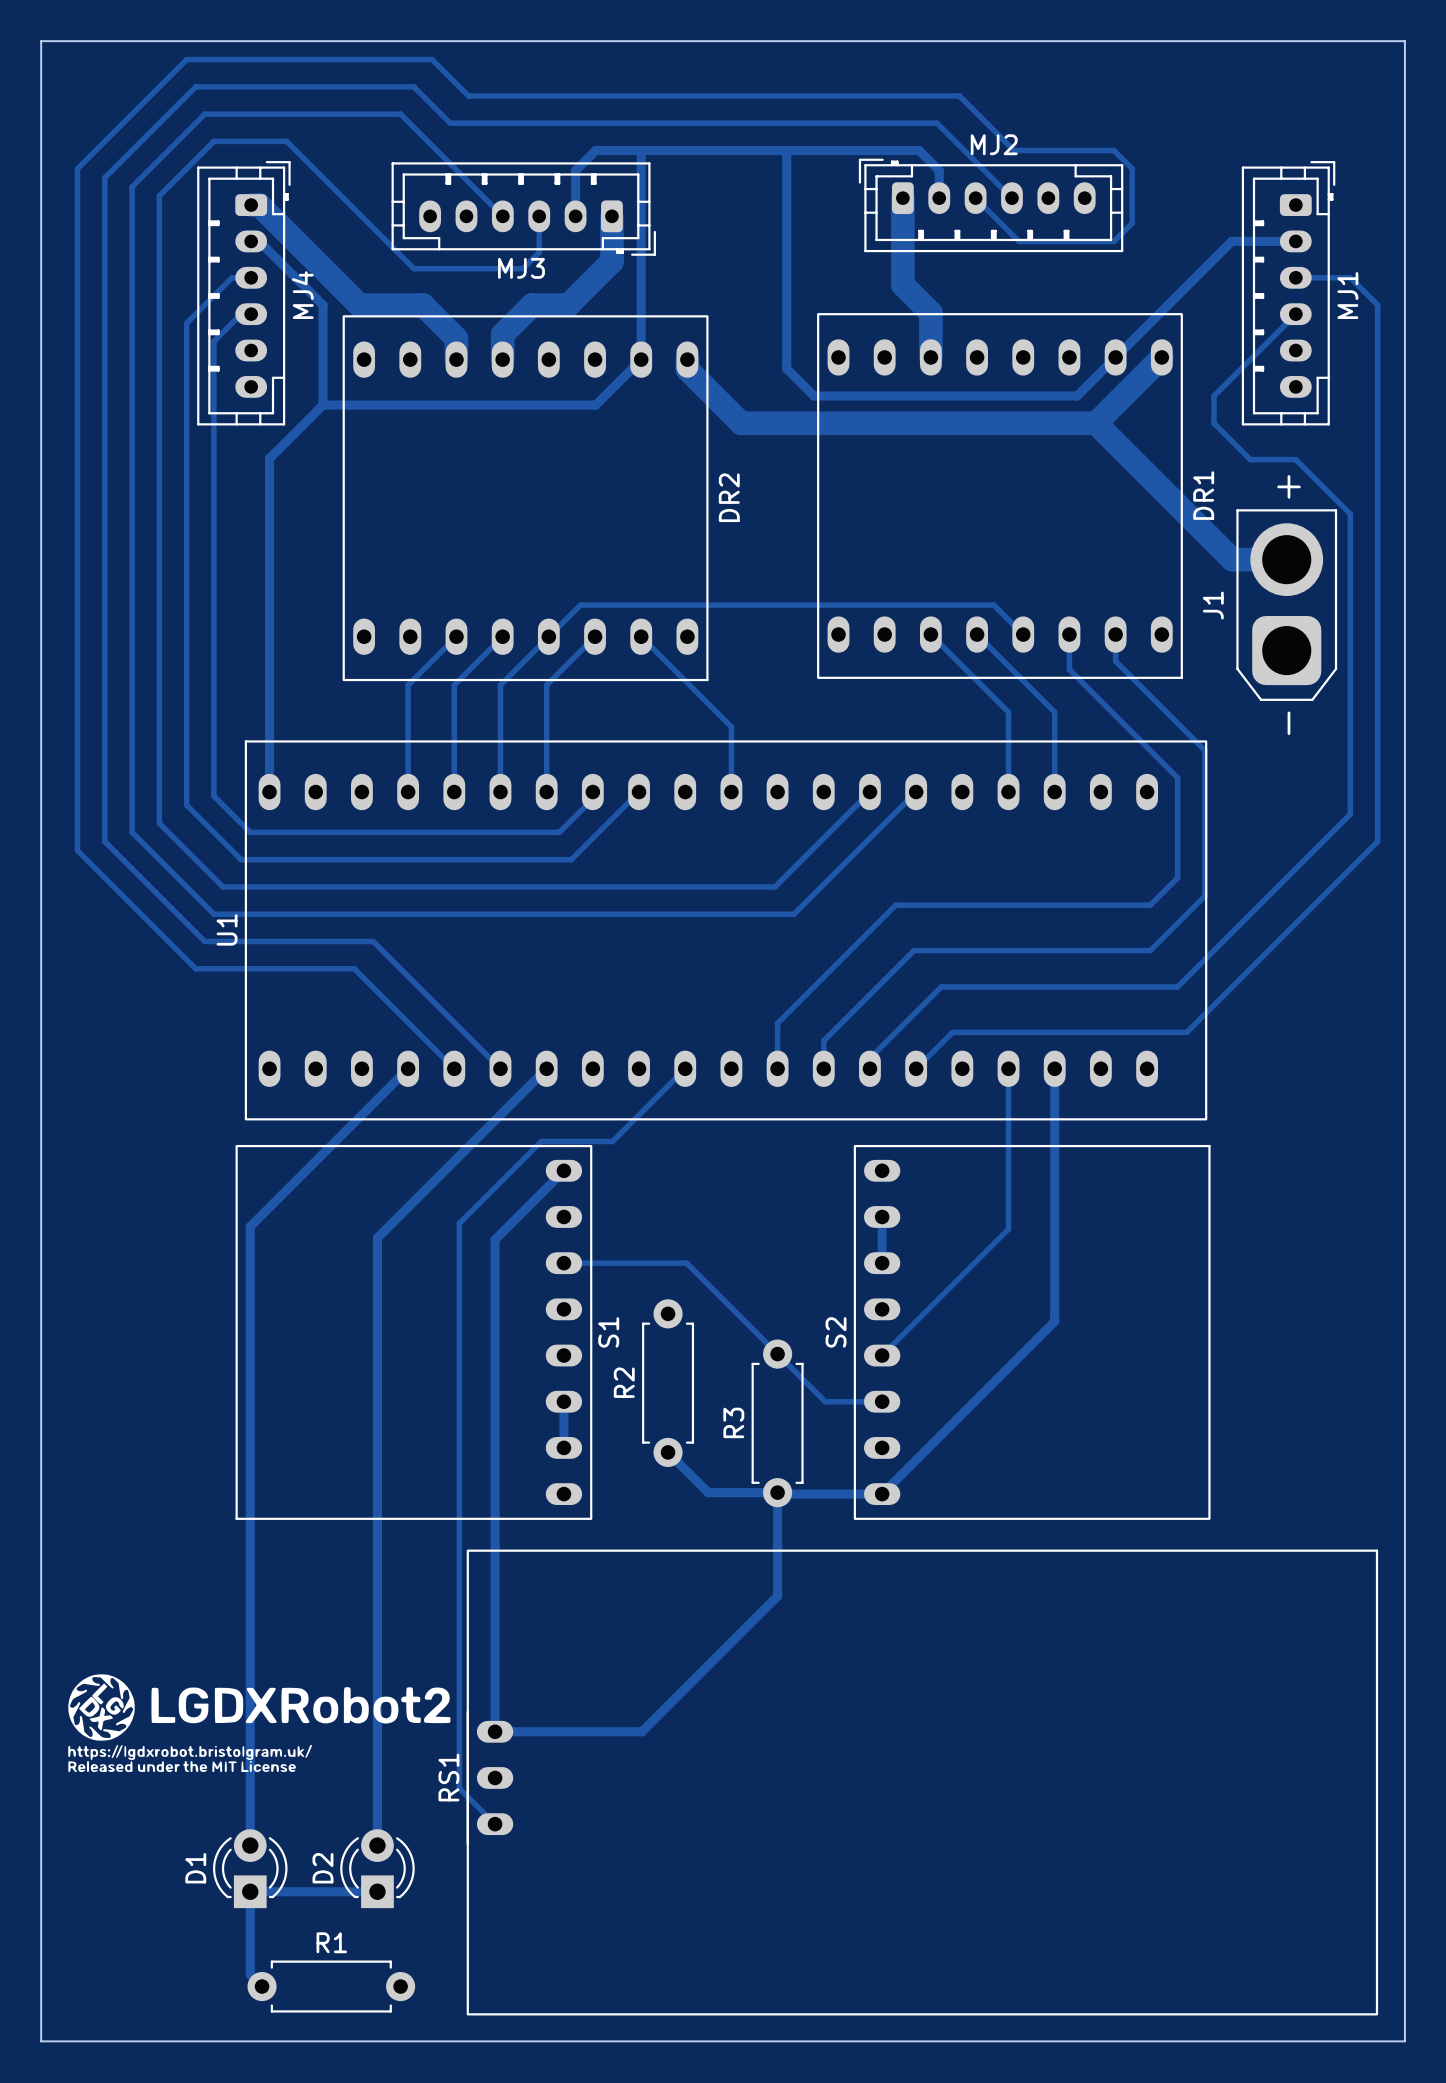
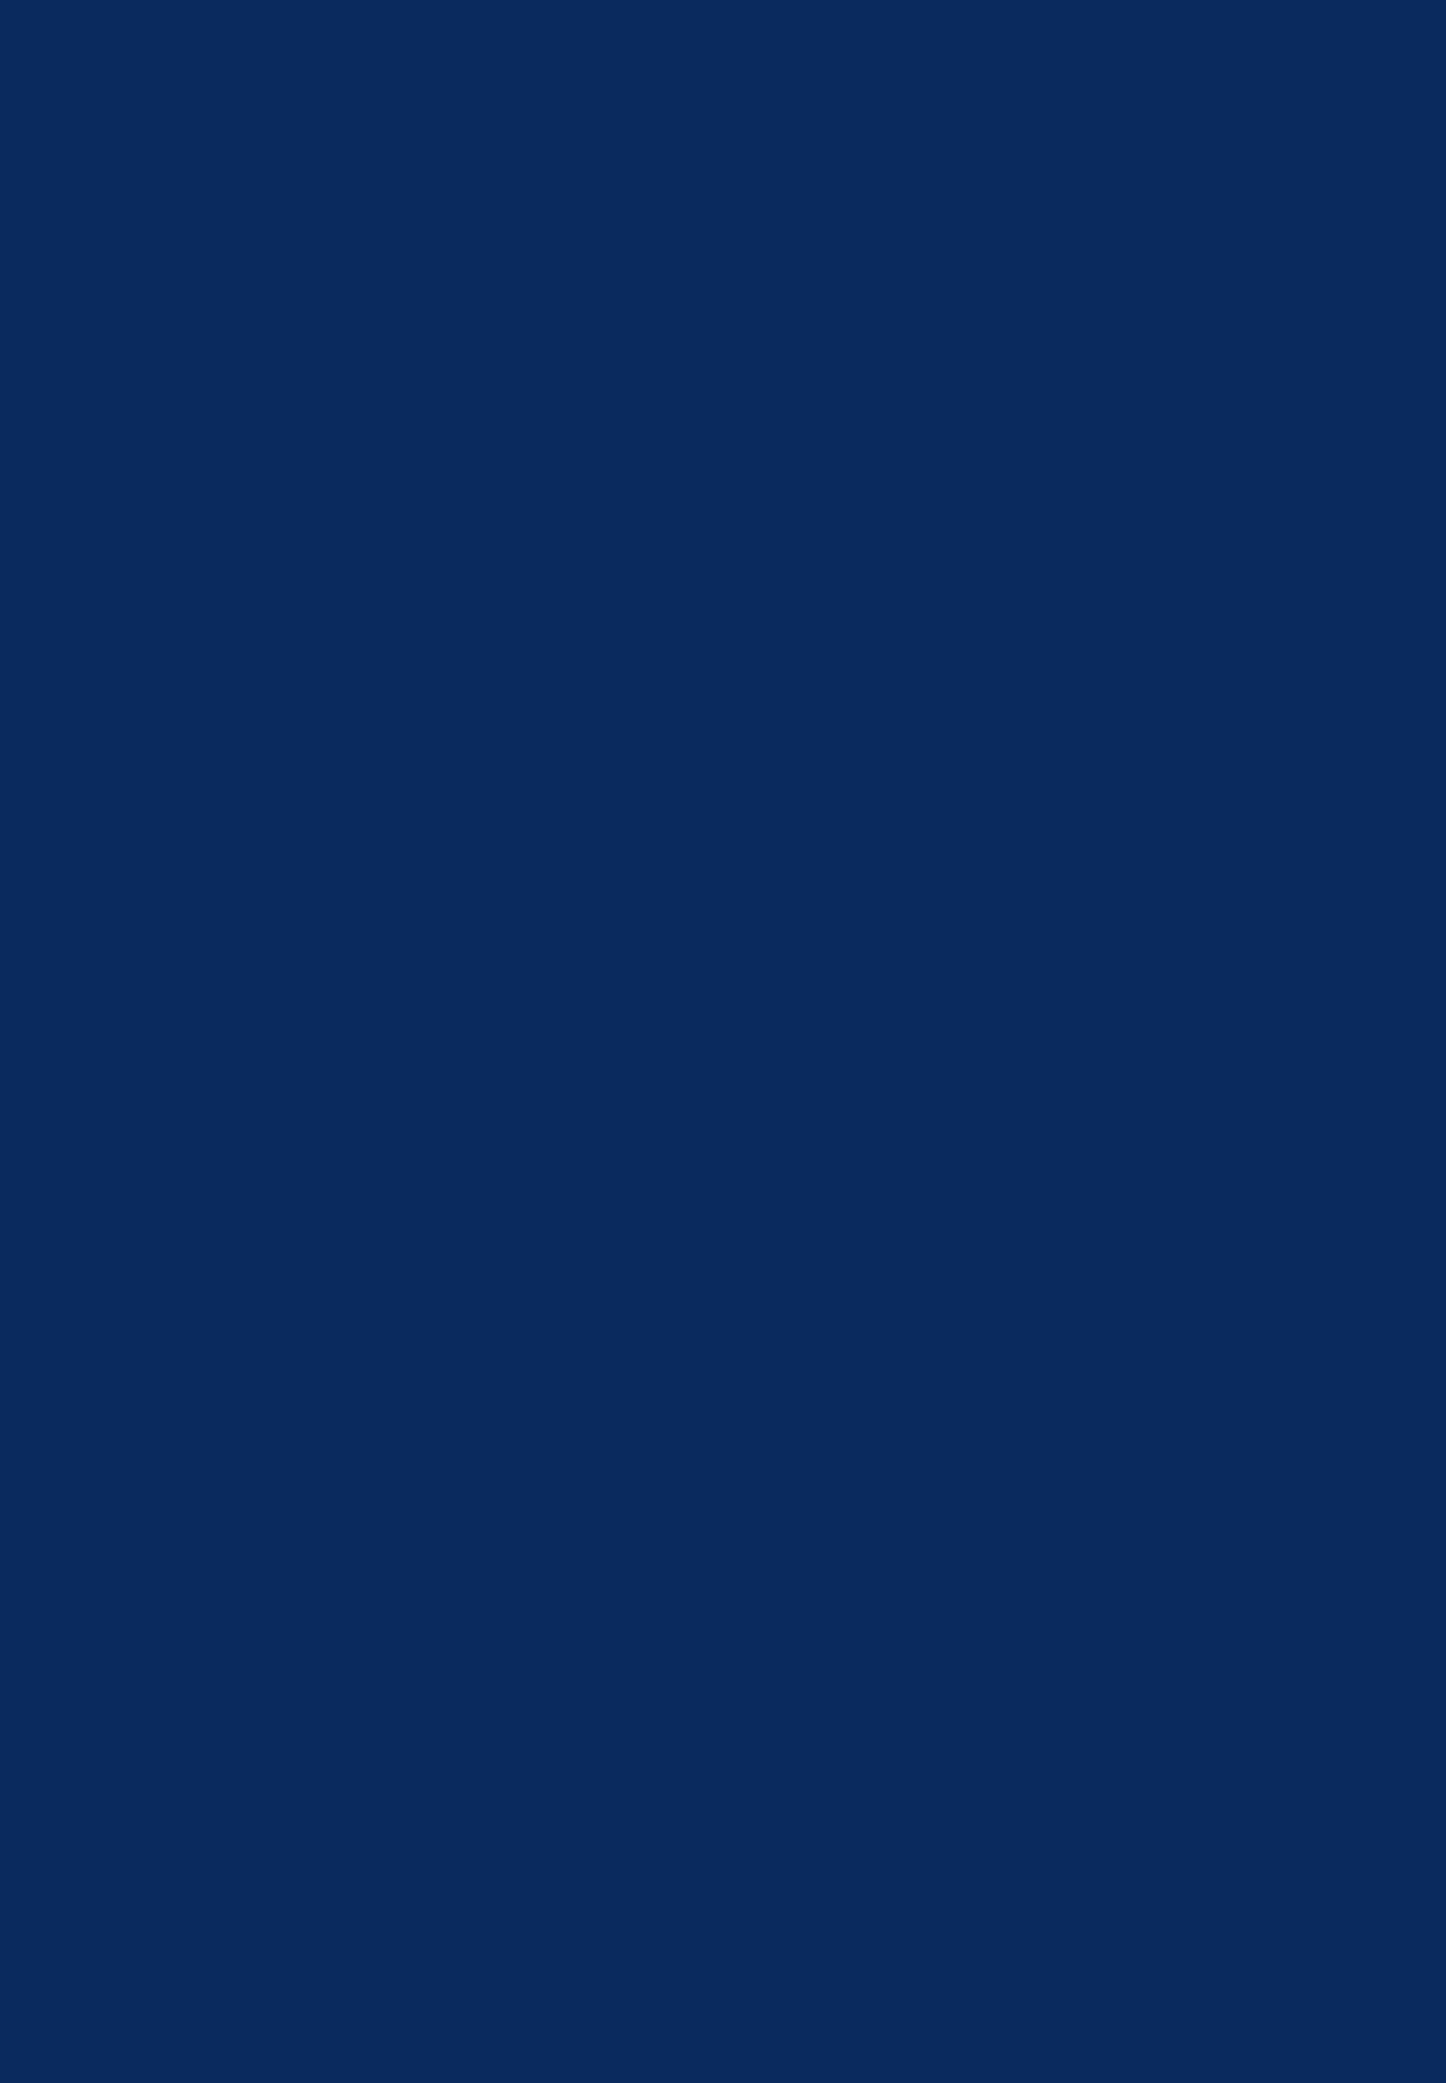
board edge: (41, 41) (1404, 41) (1404, 2041) (41, 2041) (41, 41) -> none
track: (641, 150) (641, 359) (595, 405) (323, 405) -> none
track: (786, 150) (786, 368) (813, 395) (1077, 395) (1231, 241) (1295, 241) -> none
track: (941, 196) (939, 198) (939, 170) (919, 150) (595, 150) (575, 170) (575, 216) -> none
track: (902, 198) (902, 284) (930, 312) (930, 357) -> none
track: (975, 198) (1018, 241) (1113, 241) (1132, 223) (1132, 168) (1113, 150) (1013, 150) (959, 95) (468, 95) (432, 59) (186, 59) (77, 168) (77, 850) (195, 968) (354, 968) (454, 1068) -> none
track: (1011, 198) (937, 123) (450, 123) (413, 86) (195, 86) (104, 177) (104, 841) (204, 941) (373, 941) (500, 1068) -> none
track: (251, 205) (259, 205) (359, 305) (423, 305) (456, 338) (456, 359) -> none
MJ2: (991, 205) -> none
MJ3: (523, 209) -> none
track: (502, 216) (400, 114) (204, 114) (132, 186) (132, 832) (213, 914) (793, 914) (916, 792) -> none
track: (539, 216) (539, 252) (523, 268) (413, 268) (286, 141) (213, 141) (159, 195) (159, 823) (223, 886) (775, 886) (869, 792) -> none
track: (611, 216) (611, 261) (568, 305) (532, 305) (502, 334) (502, 359) -> none
track: (251, 241) (259, 241) (323, 305) (323, 405) -> none
track: (251, 277) (232, 277) (186, 323) (186, 805) (241, 859) (571, 859) (639, 792) -> none
track: (1295, 277) (1350, 277) (1377, 305) (1377, 841) (1186, 1032) (952, 1032) (916, 1068) -> none
MJ4: (243, 293) -> none
MJ1: (1288, 293) -> none
track: (251, 314) (241, 314) (213, 341) (213, 796) (250, 832) (559, 832) (592, 798) (592, 792) -> none
track: (1295, 314) (1214, 395) (1214, 423) (1250, 459) (1295, 459) (1350, 514) (1350, 814) (1177, 986) (941, 986) (869, 1058) (869, 1068) -> none
track: (1161, 357) (1095, 423) -> none
track: (687, 359) (687, 369) (741, 423) (1095, 423) -> none
track: (323, 405) (269, 458) (269, 792) -> none
track: (1095, 423) (1232, 559) (1286, 559) -> none
DR1: (999, 496) -> none
DR2: (525, 498) -> none
J1: (1286, 605) -> none
track: (930, 634) (1008, 712) (1008, 792) -> none
track: (977, 634) (1054, 712) (1054, 792) -> none
track: (1023, 634) (993, 605) (580, 605) (500, 685) (500, 792) -> none
track: (1069, 634) (1069, 669) (1177, 777) (1177, 877) (1150, 905) (895, 905) (777, 1023) (777, 1068) -> none
track: (1115, 634) (1115, 661) (1204, 750) (1204, 896) (1150, 950) (913, 950) (823, 1040) (823, 1068) -> none
track: (456, 636) (408, 685) (408, 792) -> none
track: (502, 636) (454, 685) (454, 792) -> none
track: (595, 636) (546, 685) (546, 792) -> none
track: (641, 636) (731, 726) (731, 792) -> none
U1: (726, 930) -> none
track: (408, 1068) (250, 1226) (250, 1845) -> none
track: (546, 1068) (377, 1237) (377, 1845) -> none
track: (685, 1068) (612, 1141) (541, 1141) (459, 1223) (459, 1788) (495, 1824) -> none
track: (1008, 1068) (1008, 1229) (882, 1355) -> none
track: (1054, 1068) (1054, 1321) (882, 1494) (777, 1492) -> none
track: (563, 1170) (495, 1239) (495, 1731) (641, 1731) (777, 1596) (777, 1492) -> none
track: (882, 1216) (882, 1263) -> none
track: (563, 1263) (686, 1263) (825, 1401) (882, 1401) -> none
S1: (413, 1332) -> none
S2: (1032, 1332) -> none
R2: (668, 1383) -> none
track: (563, 1401) (563, 1447) -> none
R3: (777, 1423) -> none
track: (668, 1452) (708, 1492) (777, 1492) -> none
drawing: [68, 1674, 451, 1773] -> none
RS1: (922, 1782) -> none
D1: (250, 1868) -> none
D2: (377, 1868) -> none
track: (377, 1891) (250, 1891) (250, 1974) (262, 1986) -> none
R1: (331, 1986) -> none

